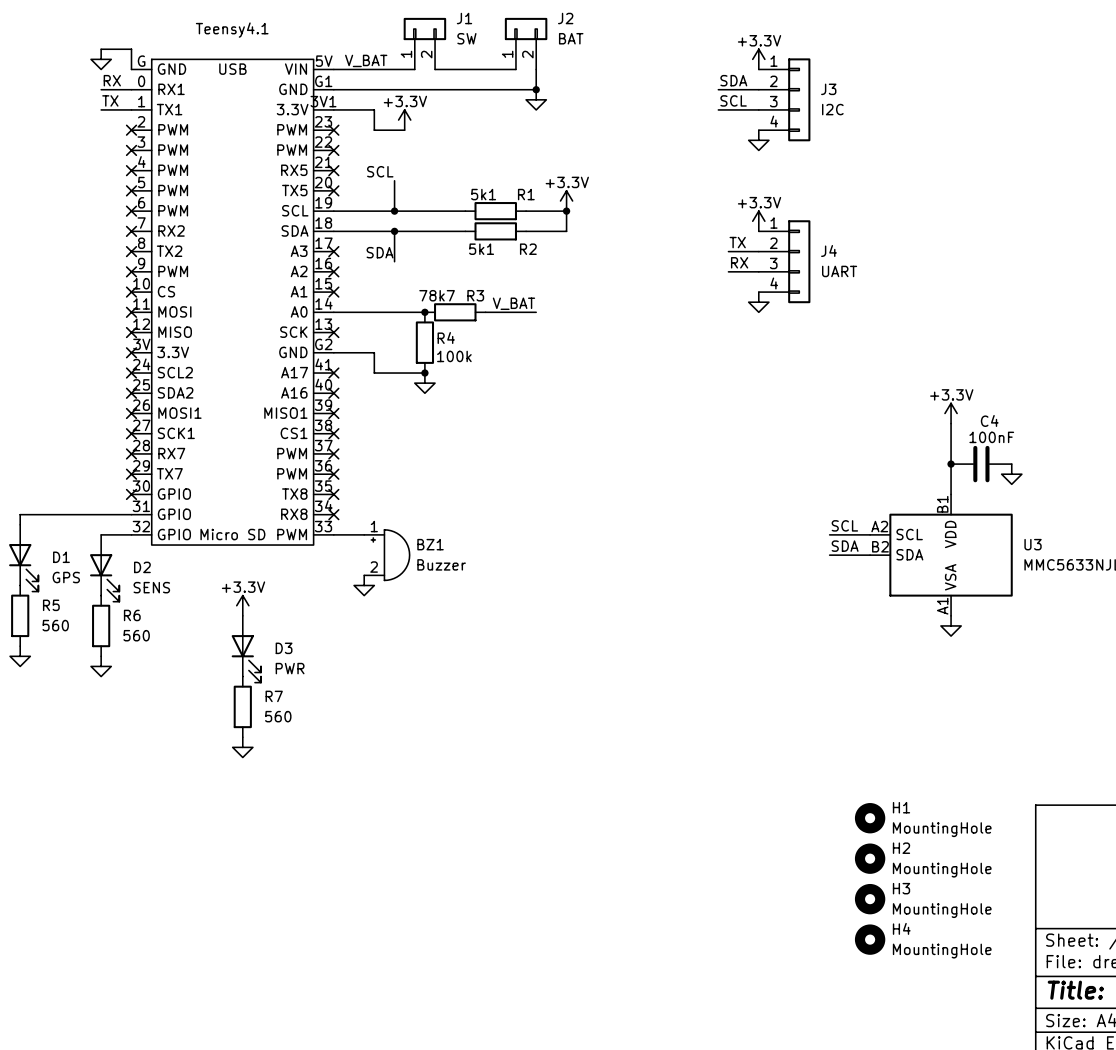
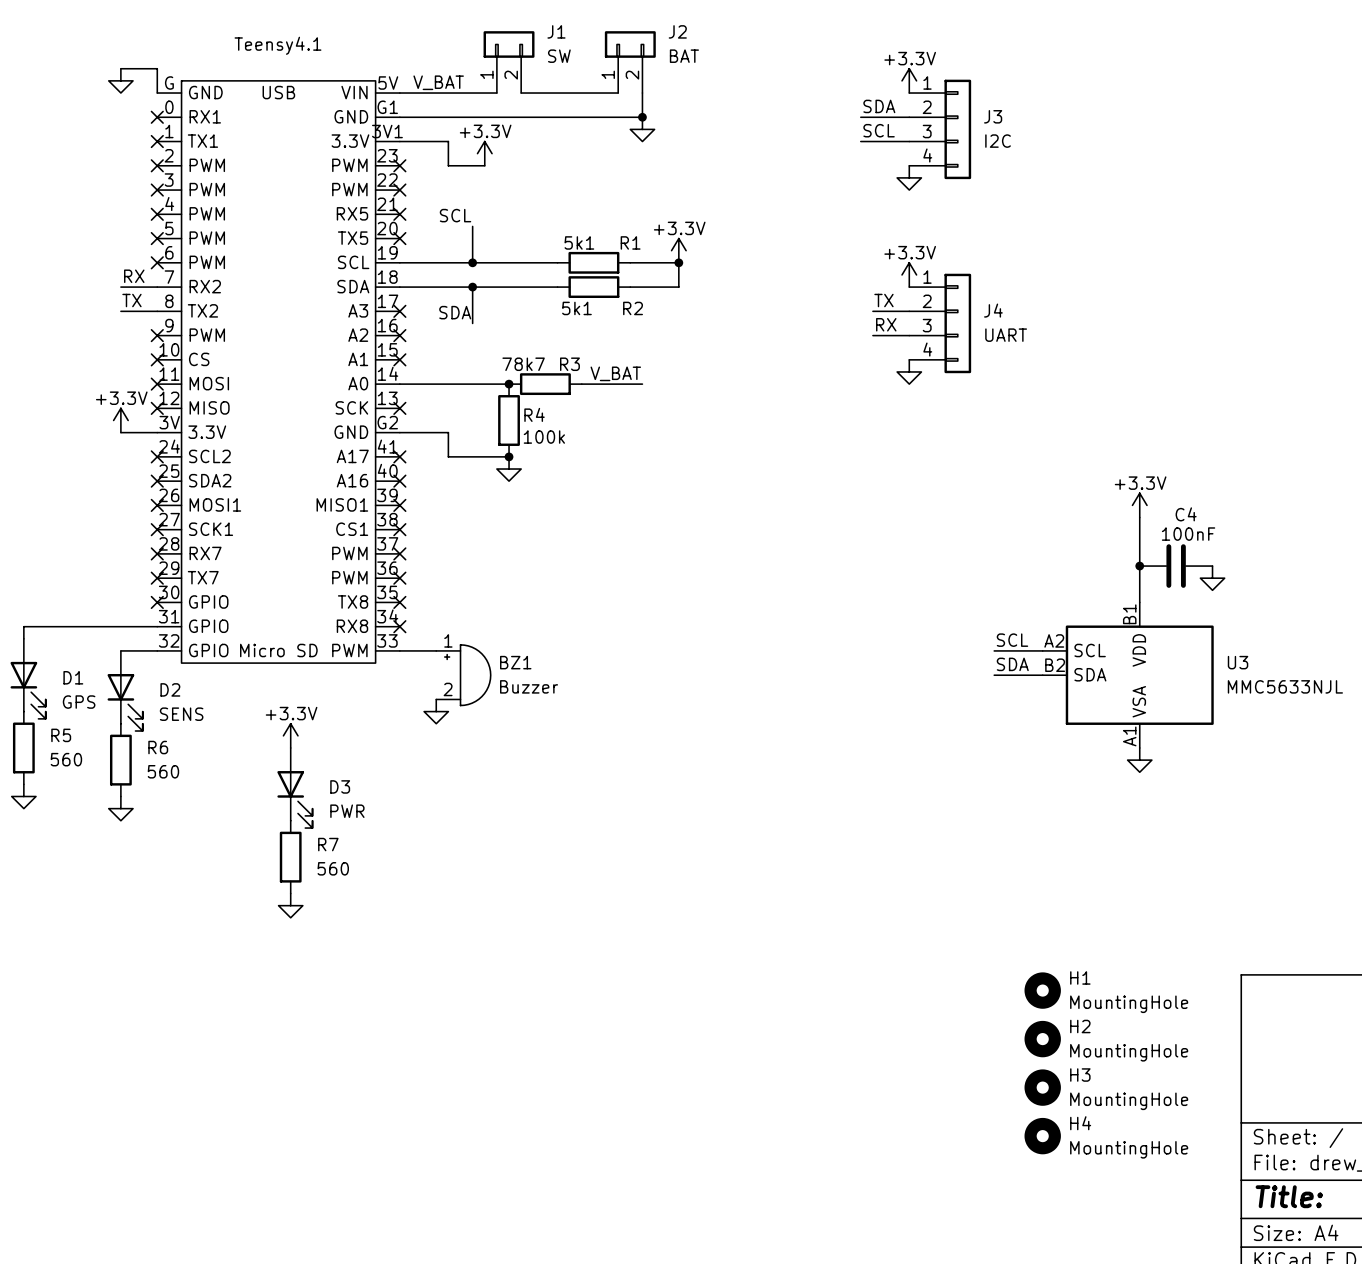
label position: RX (112, 80) -> RX (134, 276)
wire: (101, 89) (131, 89) -> (120, 287) (157, 287)
no-connect mark: none -> (157, 117)
label position: TX (110, 100) -> TX (131, 300)
wire: (101, 109) (131, 109) -> (120, 311) (157, 311)
no-connect mark: none -> (157, 141)
no-connect mark: (131, 231) -> none
no-connect mark: (131, 251) -> none
power symbol: none -> +3.3V (120, 420)
wire: none -> (120, 432) (157, 432)
no-connect mark: (131, 352) -> none

